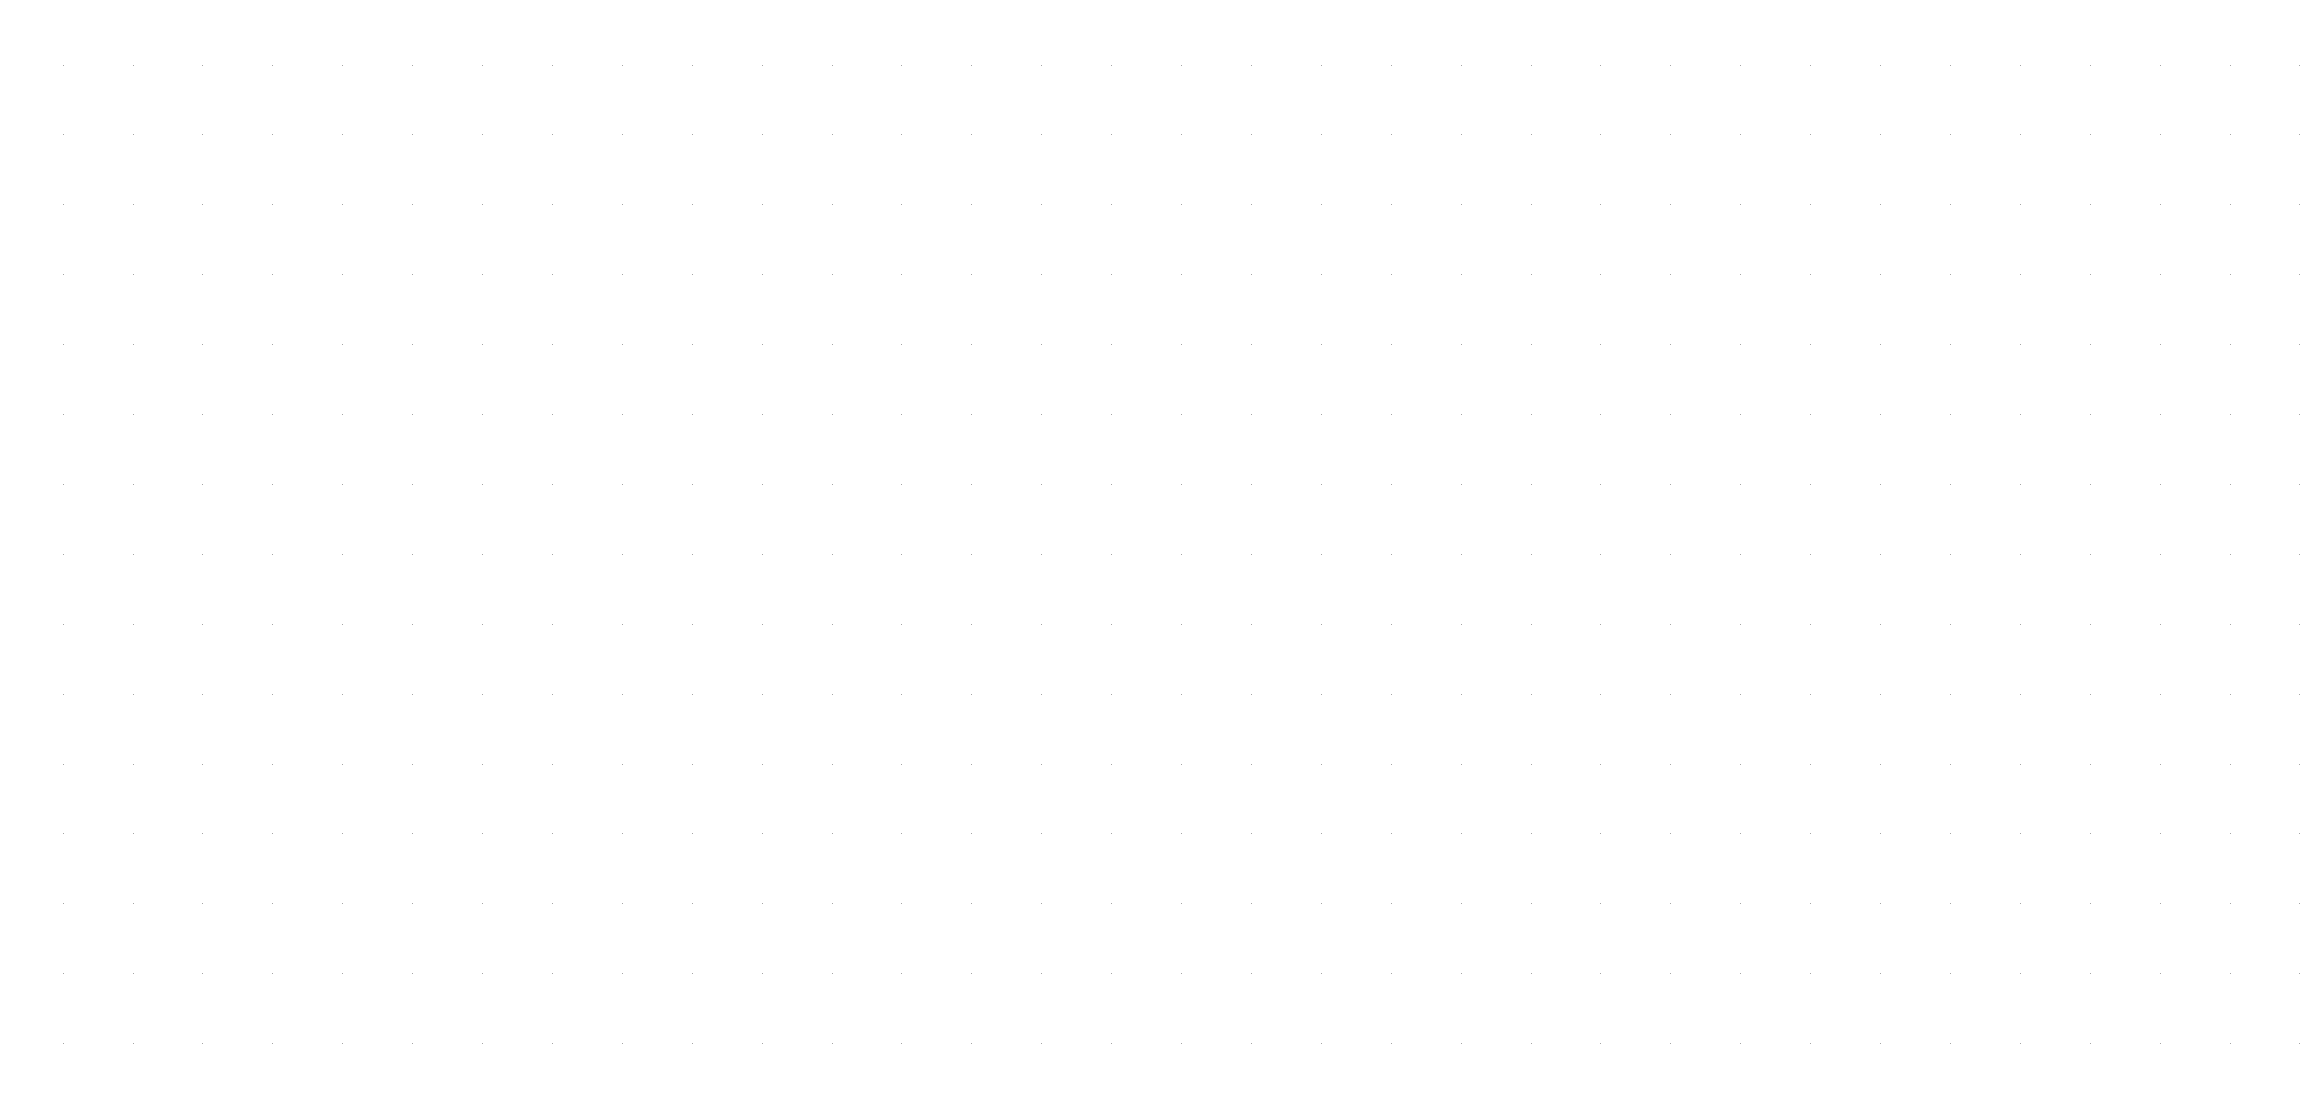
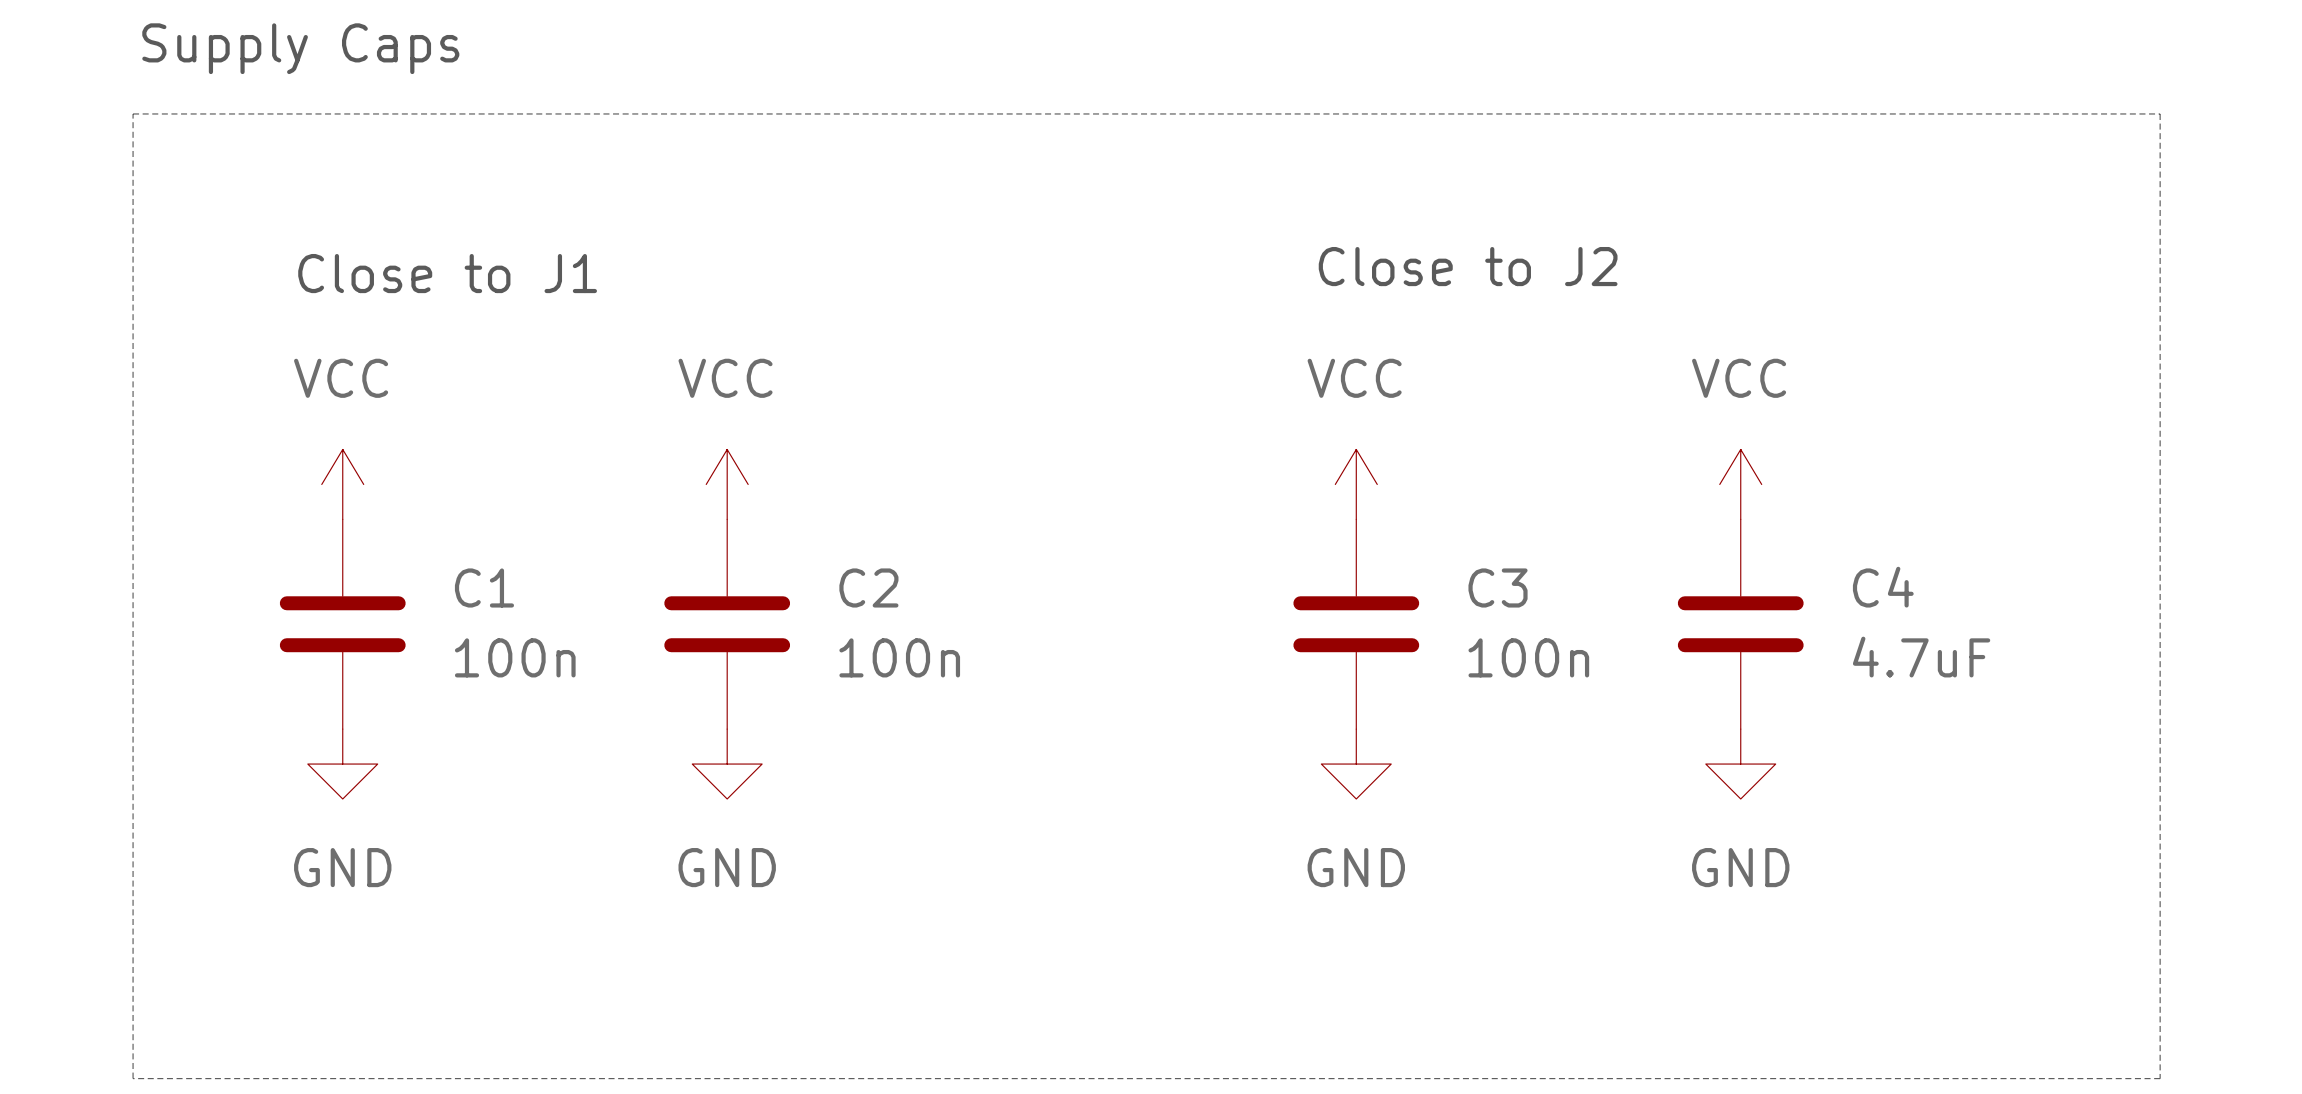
text: none -> Supply Caps (300, 48)
line: none -> (133, 113) (2160, 113) (2160, 1078) (133, 1078) (133, 113)
text: none -> Close to J2 (1468, 266)
text: none -> Close to J1 (447, 273)
power symbol: none -> VCC (342, 484)
power symbol: none -> VCC (727, 484)
power symbol: none -> VCC (1356, 484)
power symbol: none -> VCC (1740, 484)
C1: none -> 100n (342, 624)
C2: none -> 100n (727, 624)
C3: none -> 100n (1356, 624)
C4: none -> 4.7uF (1740, 624)
power symbol: none -> GND (342, 764)
power symbol: none -> GND (727, 764)
power symbol: none -> GND (1356, 764)
power symbol: none -> GND (1740, 764)

